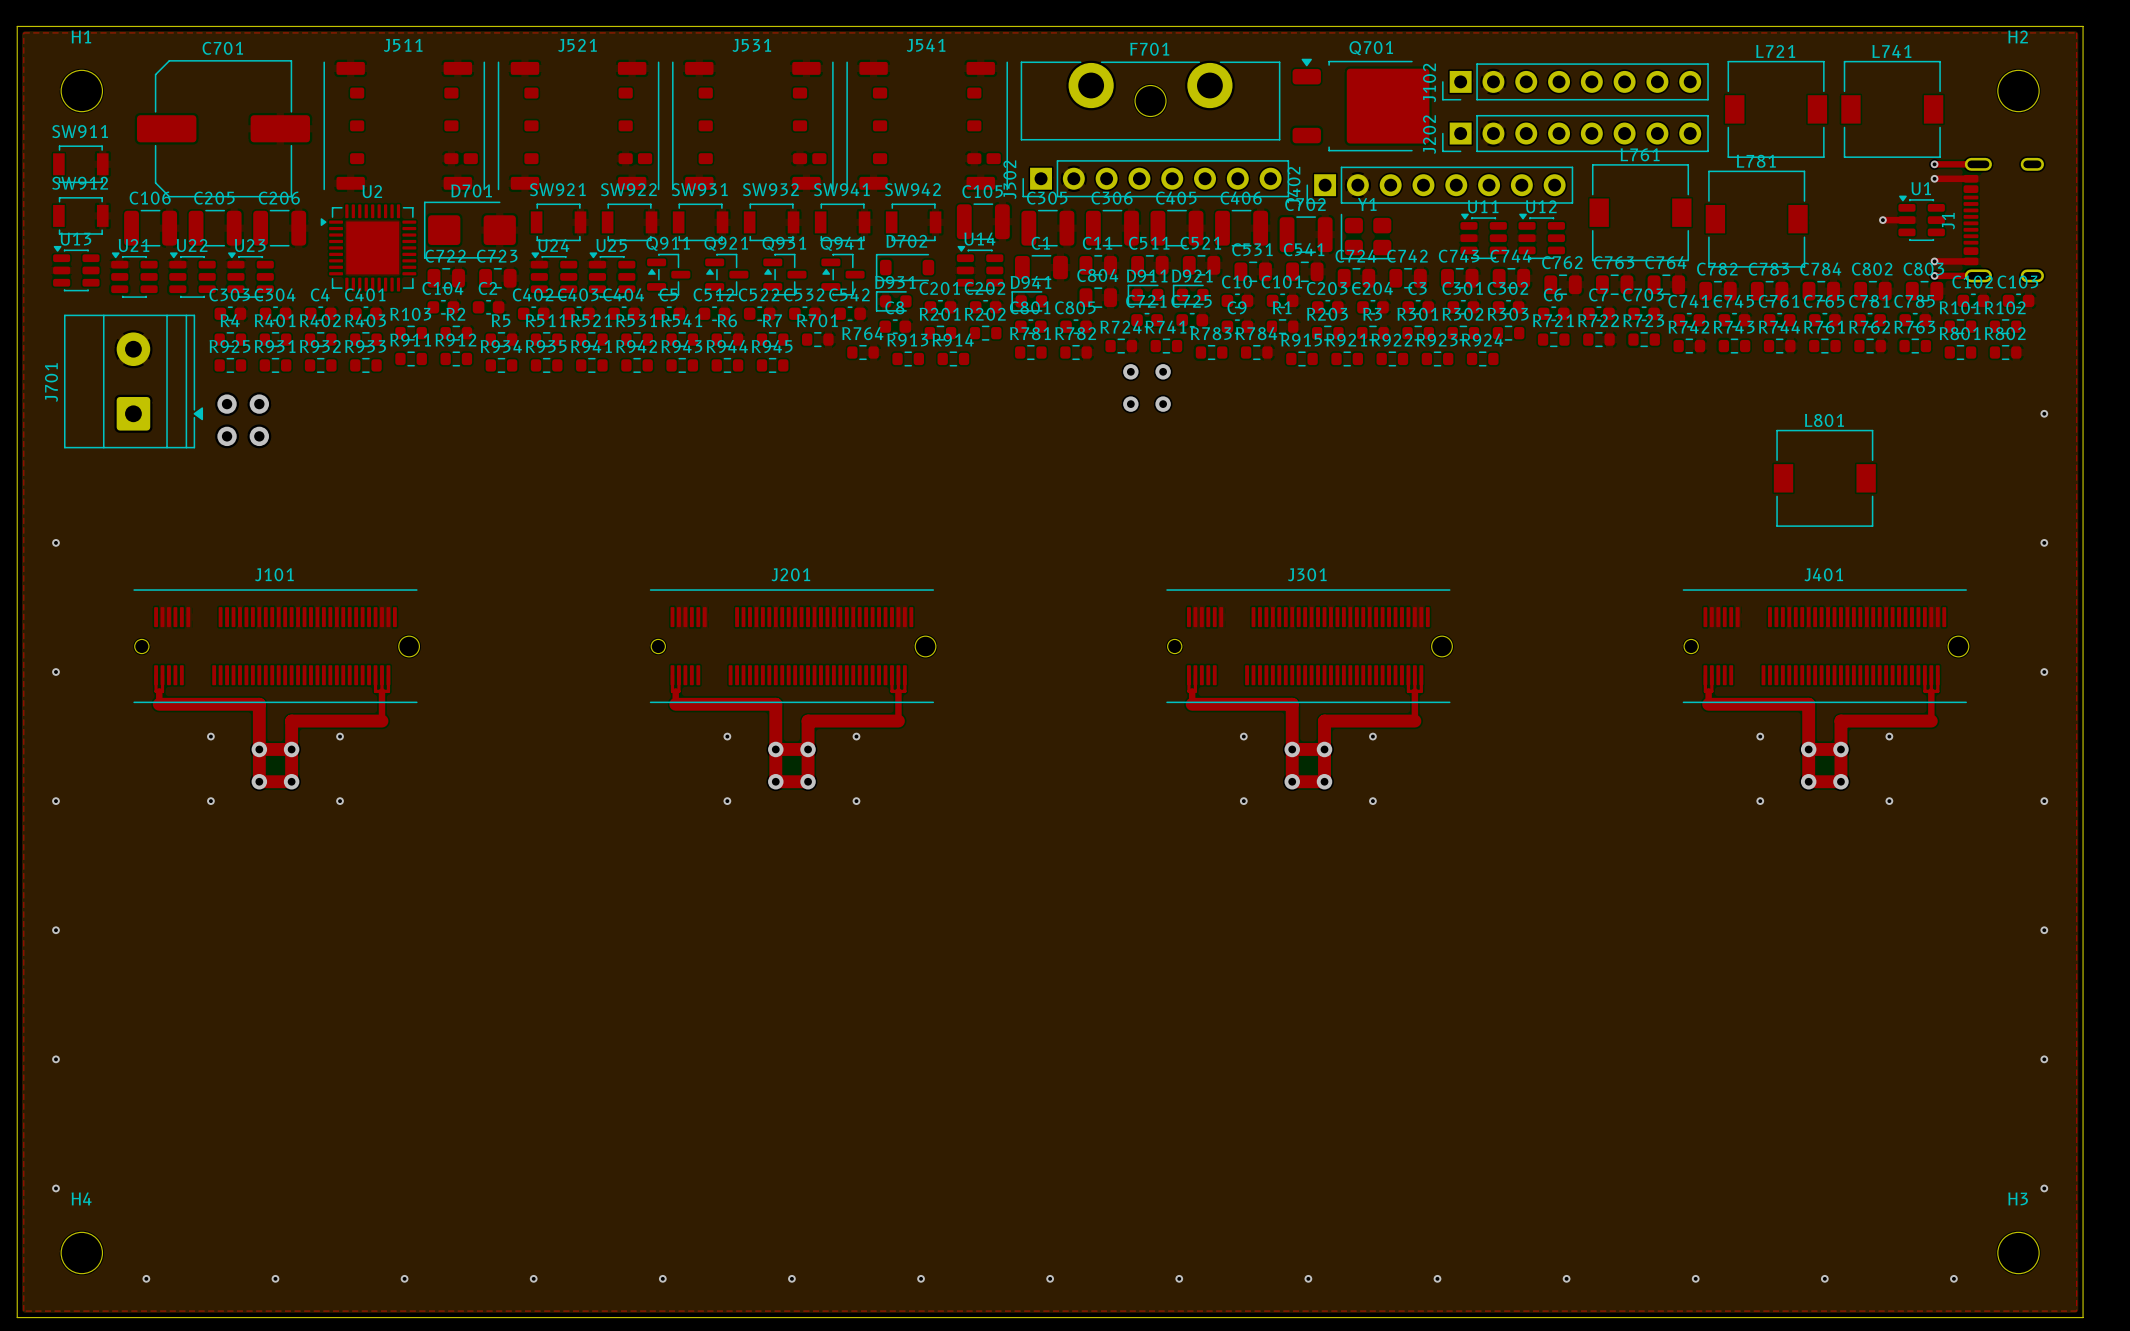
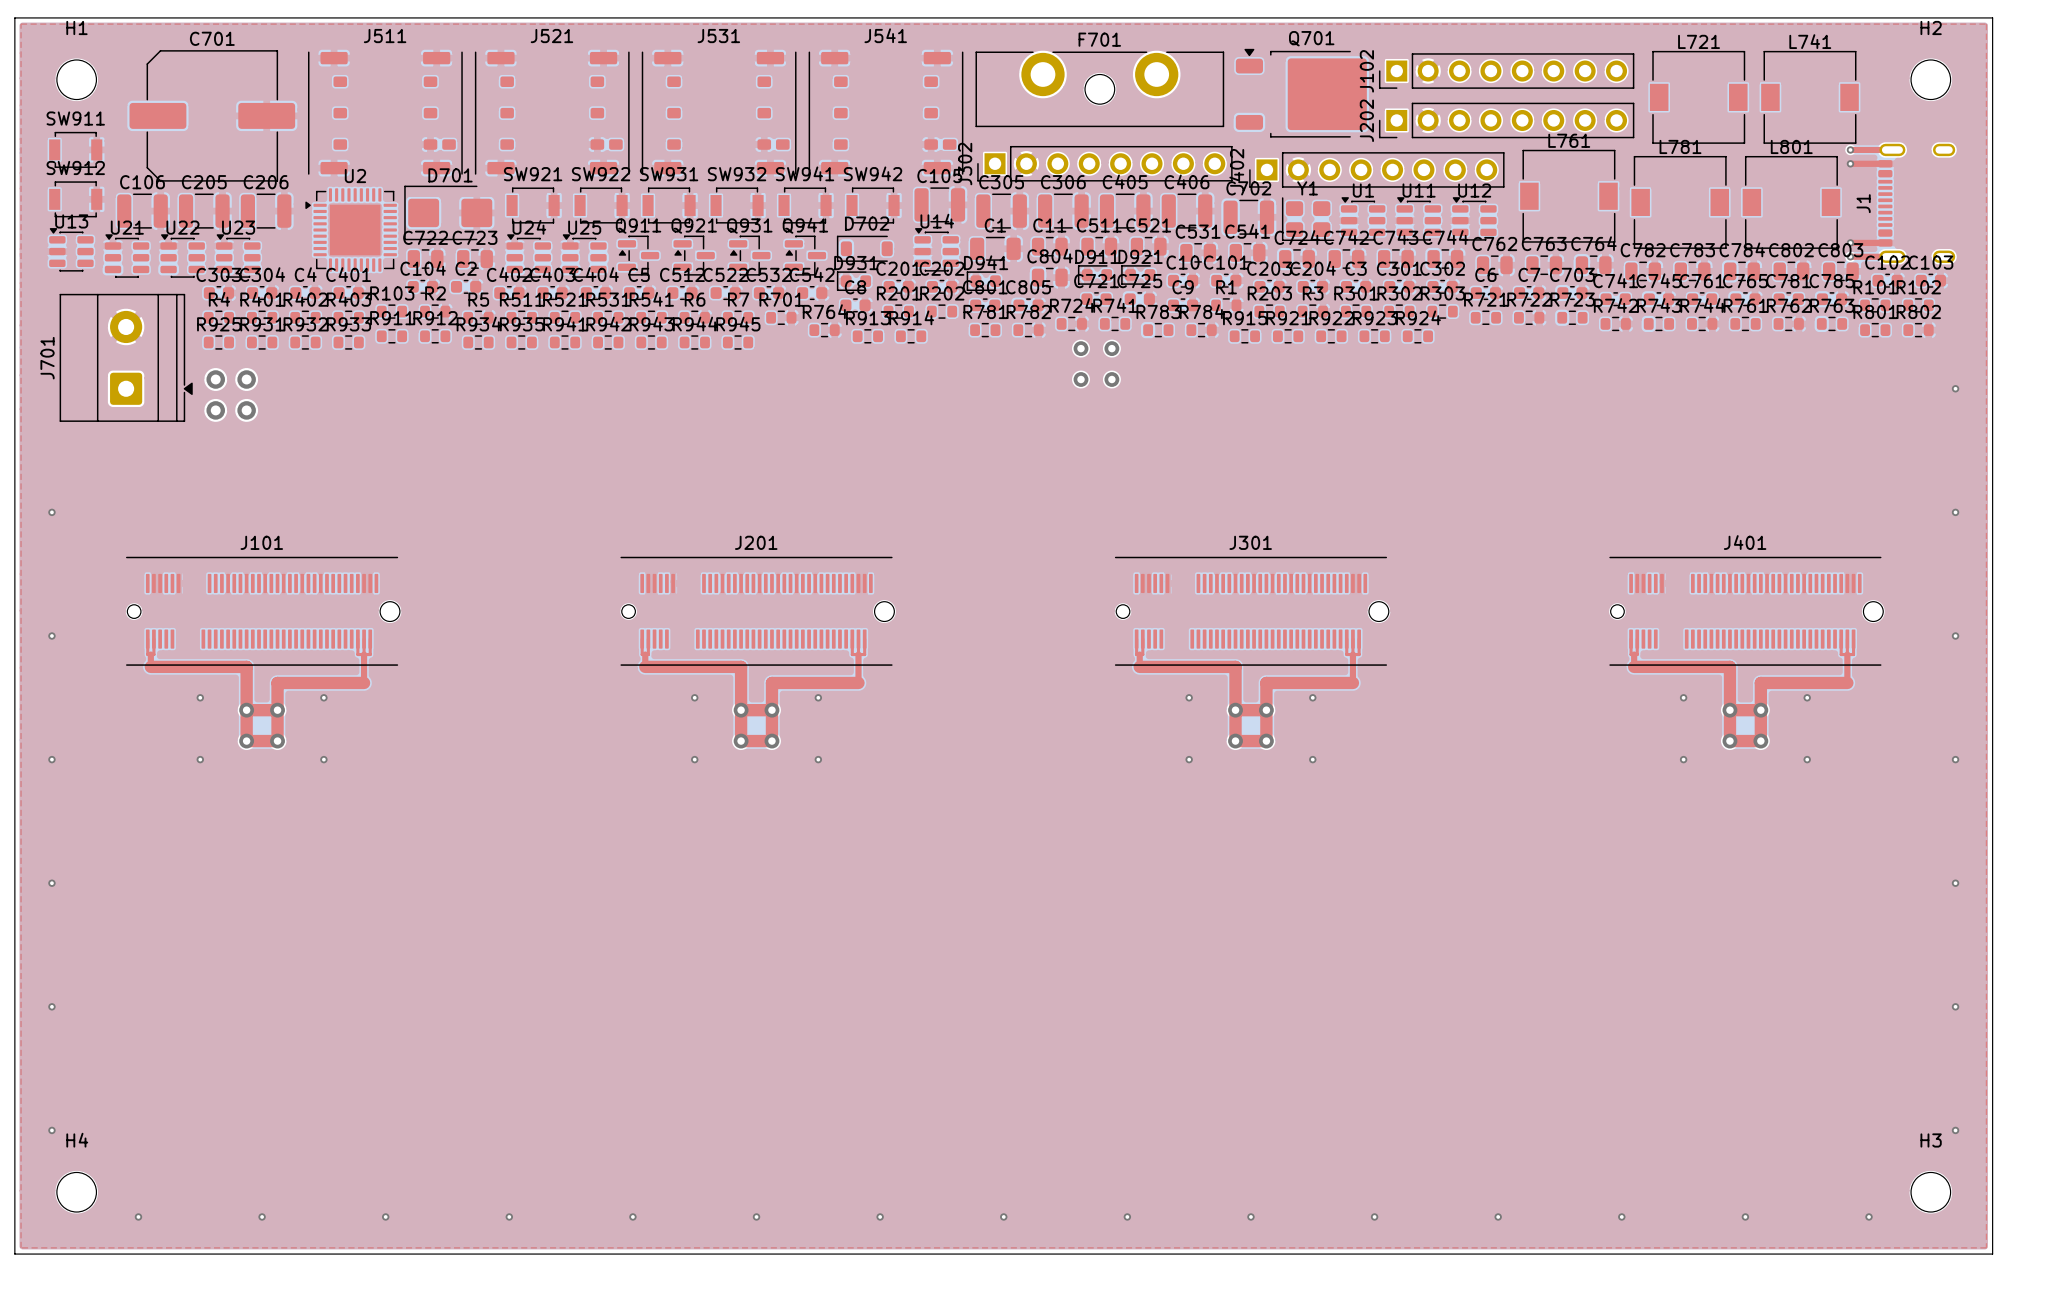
U1 position: (1921, 218) -> (1363, 218)
top track: (1882, 220) (1906, 220) -> none
via: (1882, 220) -> none
L801 position: (1824, 478) -> (1791, 202)

